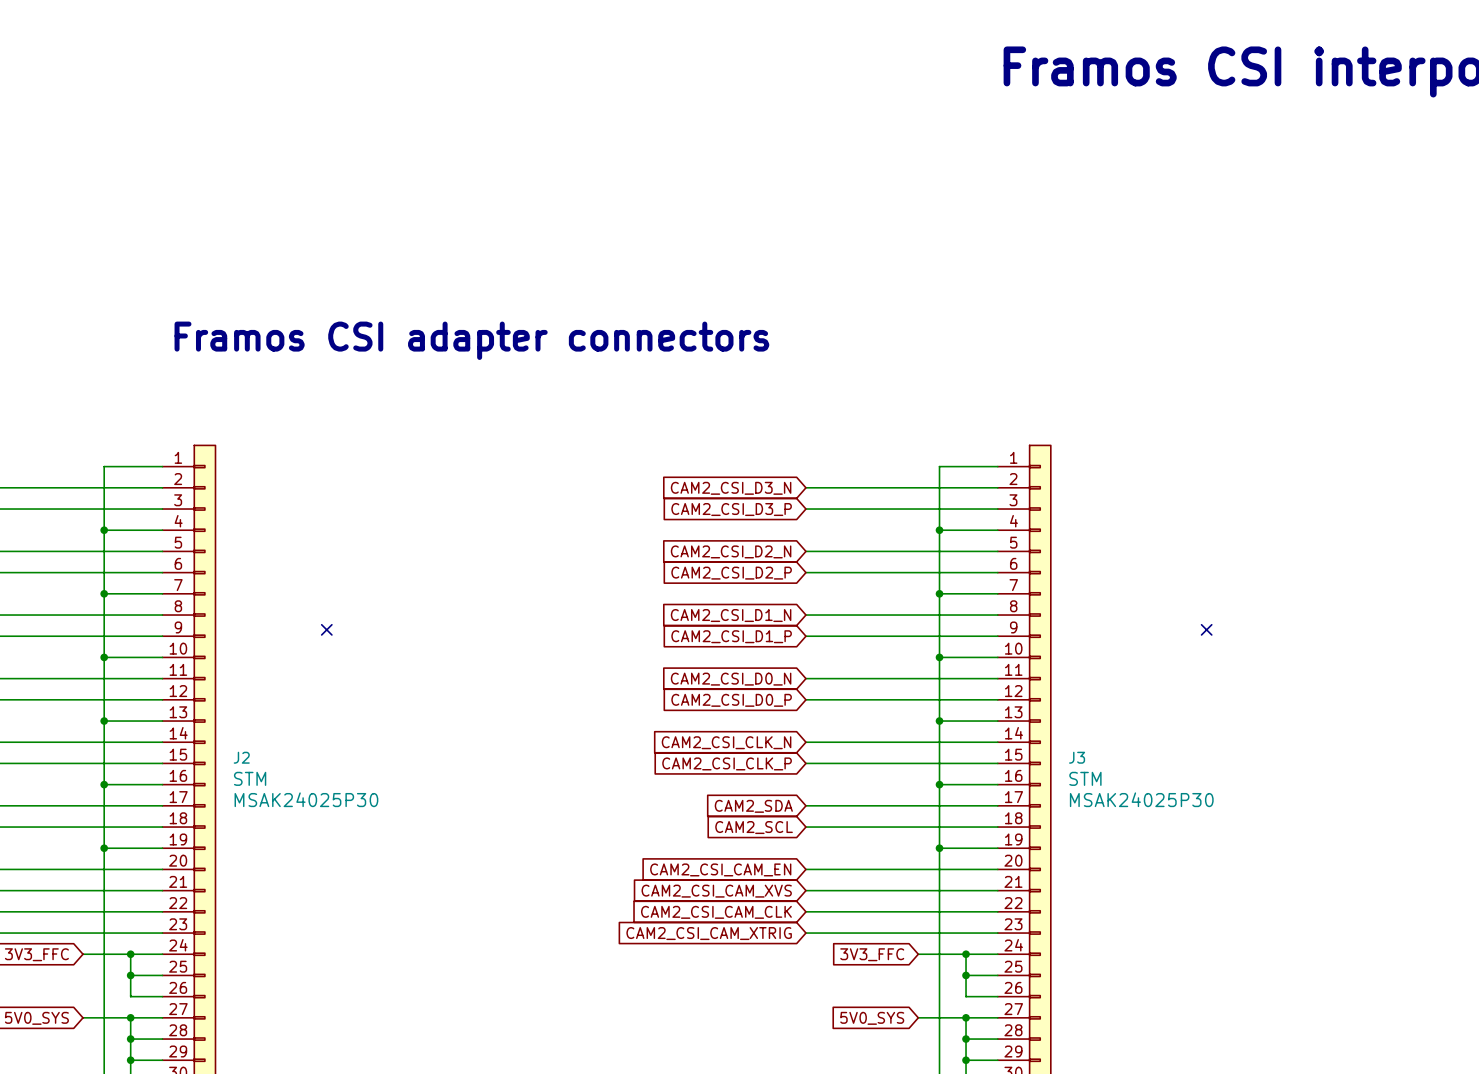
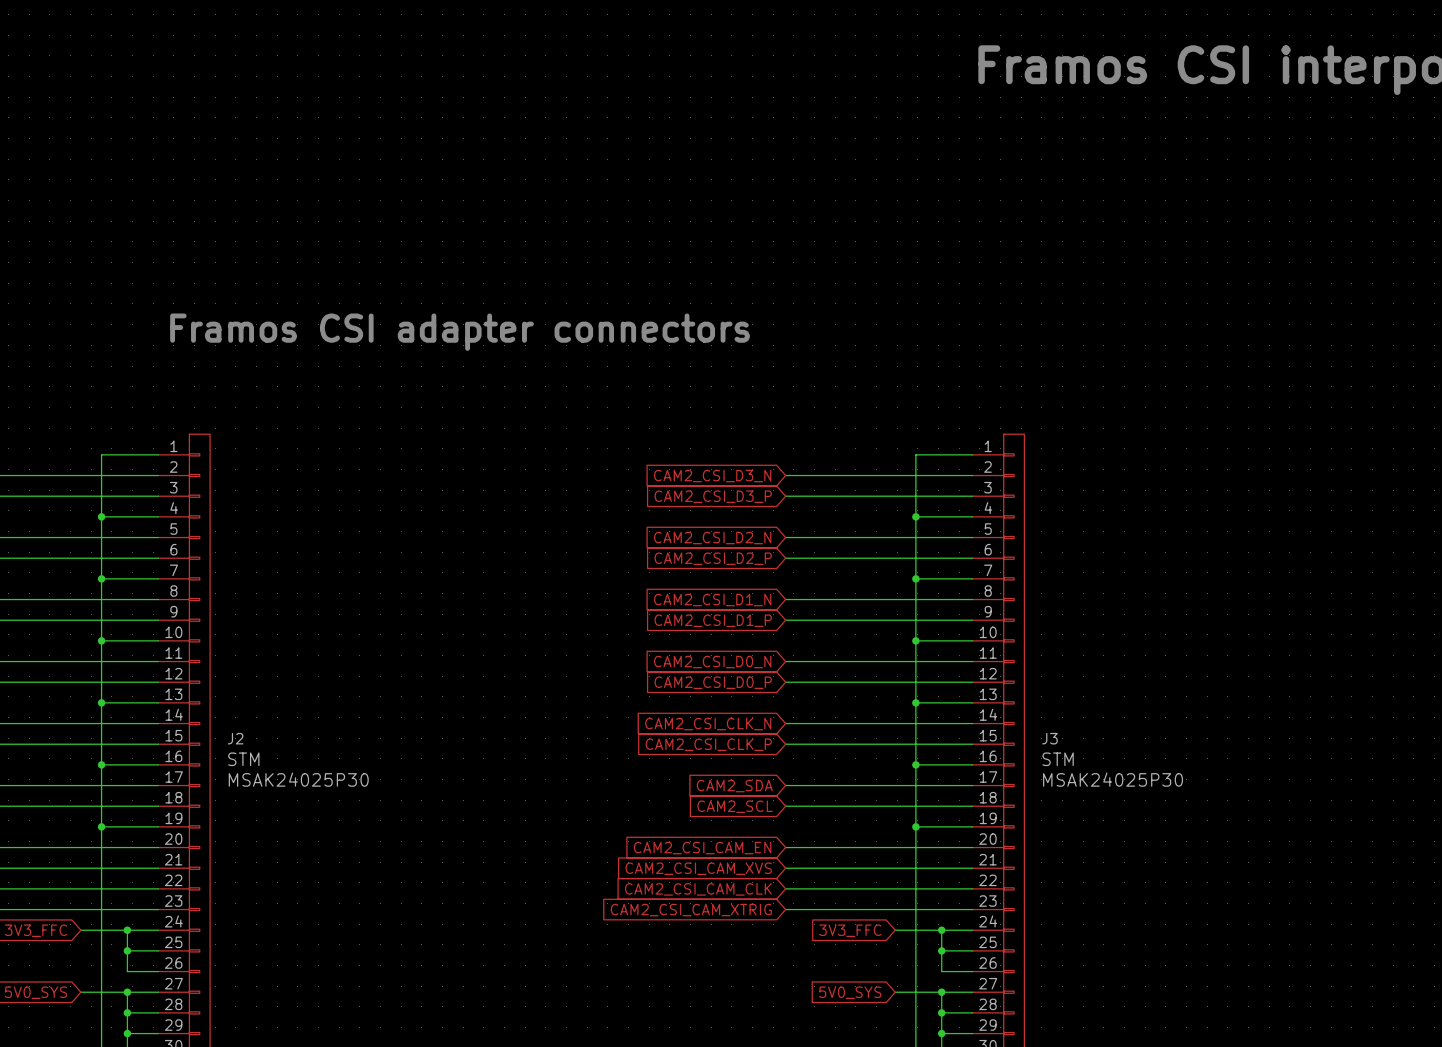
no-connect mark: (326, 629) -> none
no-connect mark: (1206, 629) -> none

